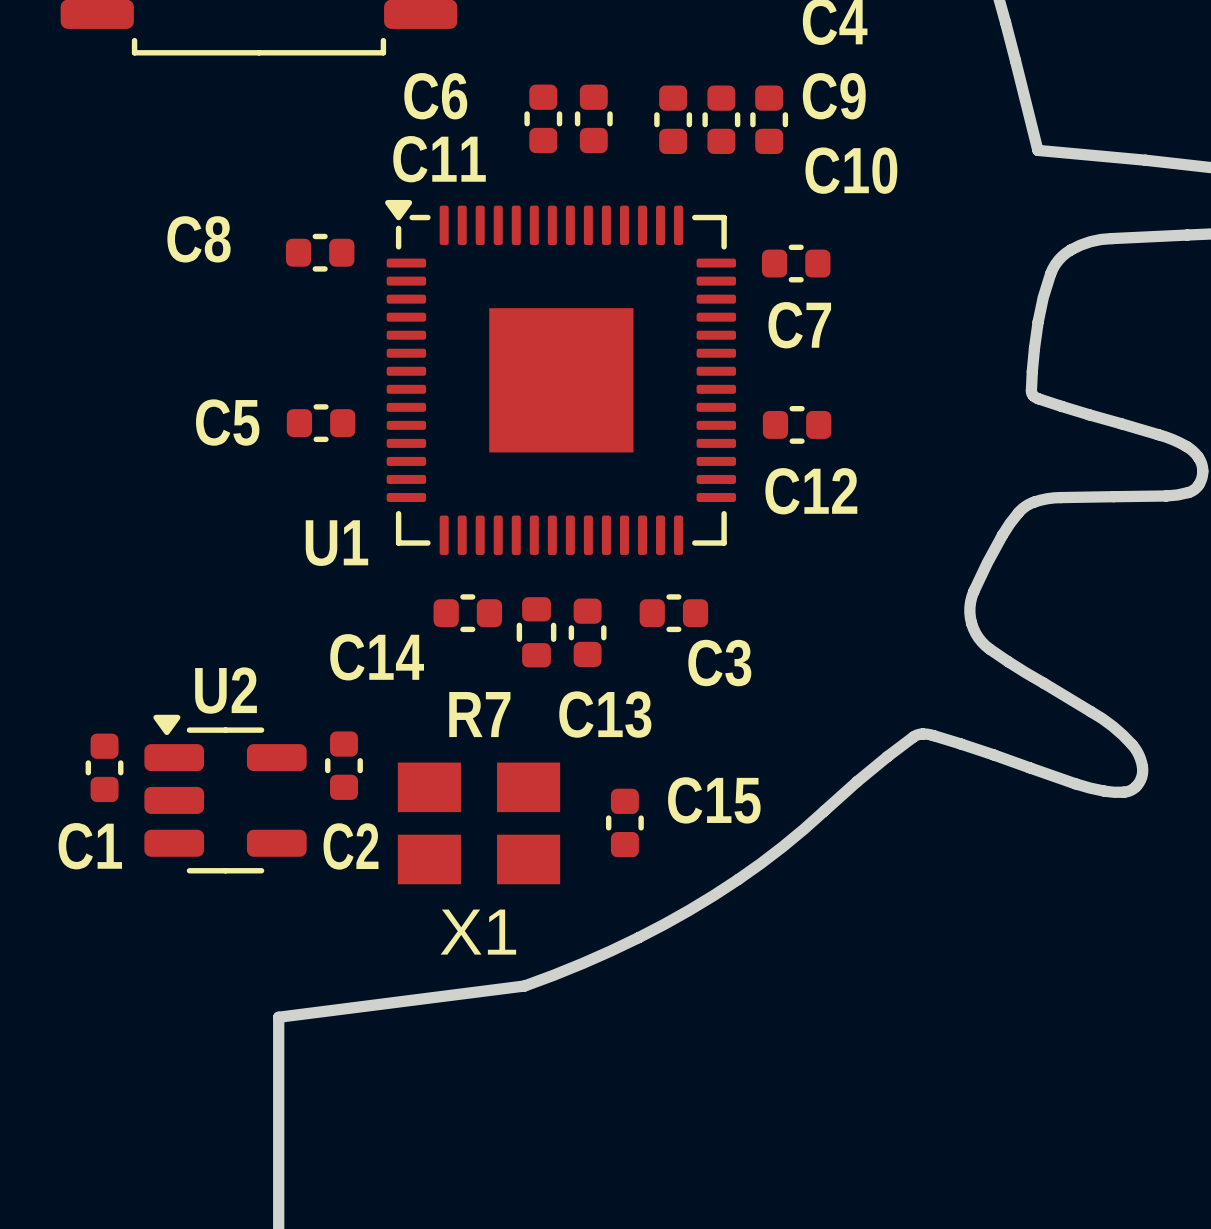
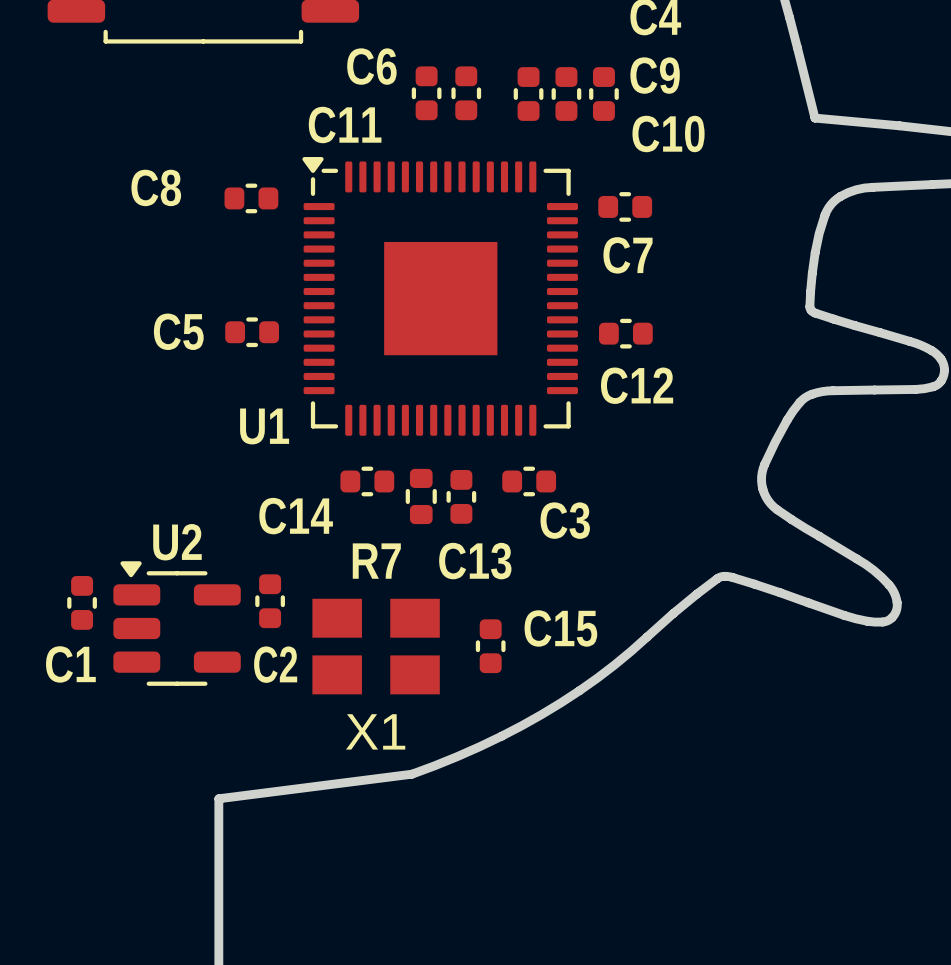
C6 name position: C6 (435, 96) -> C6 (371, 66)

